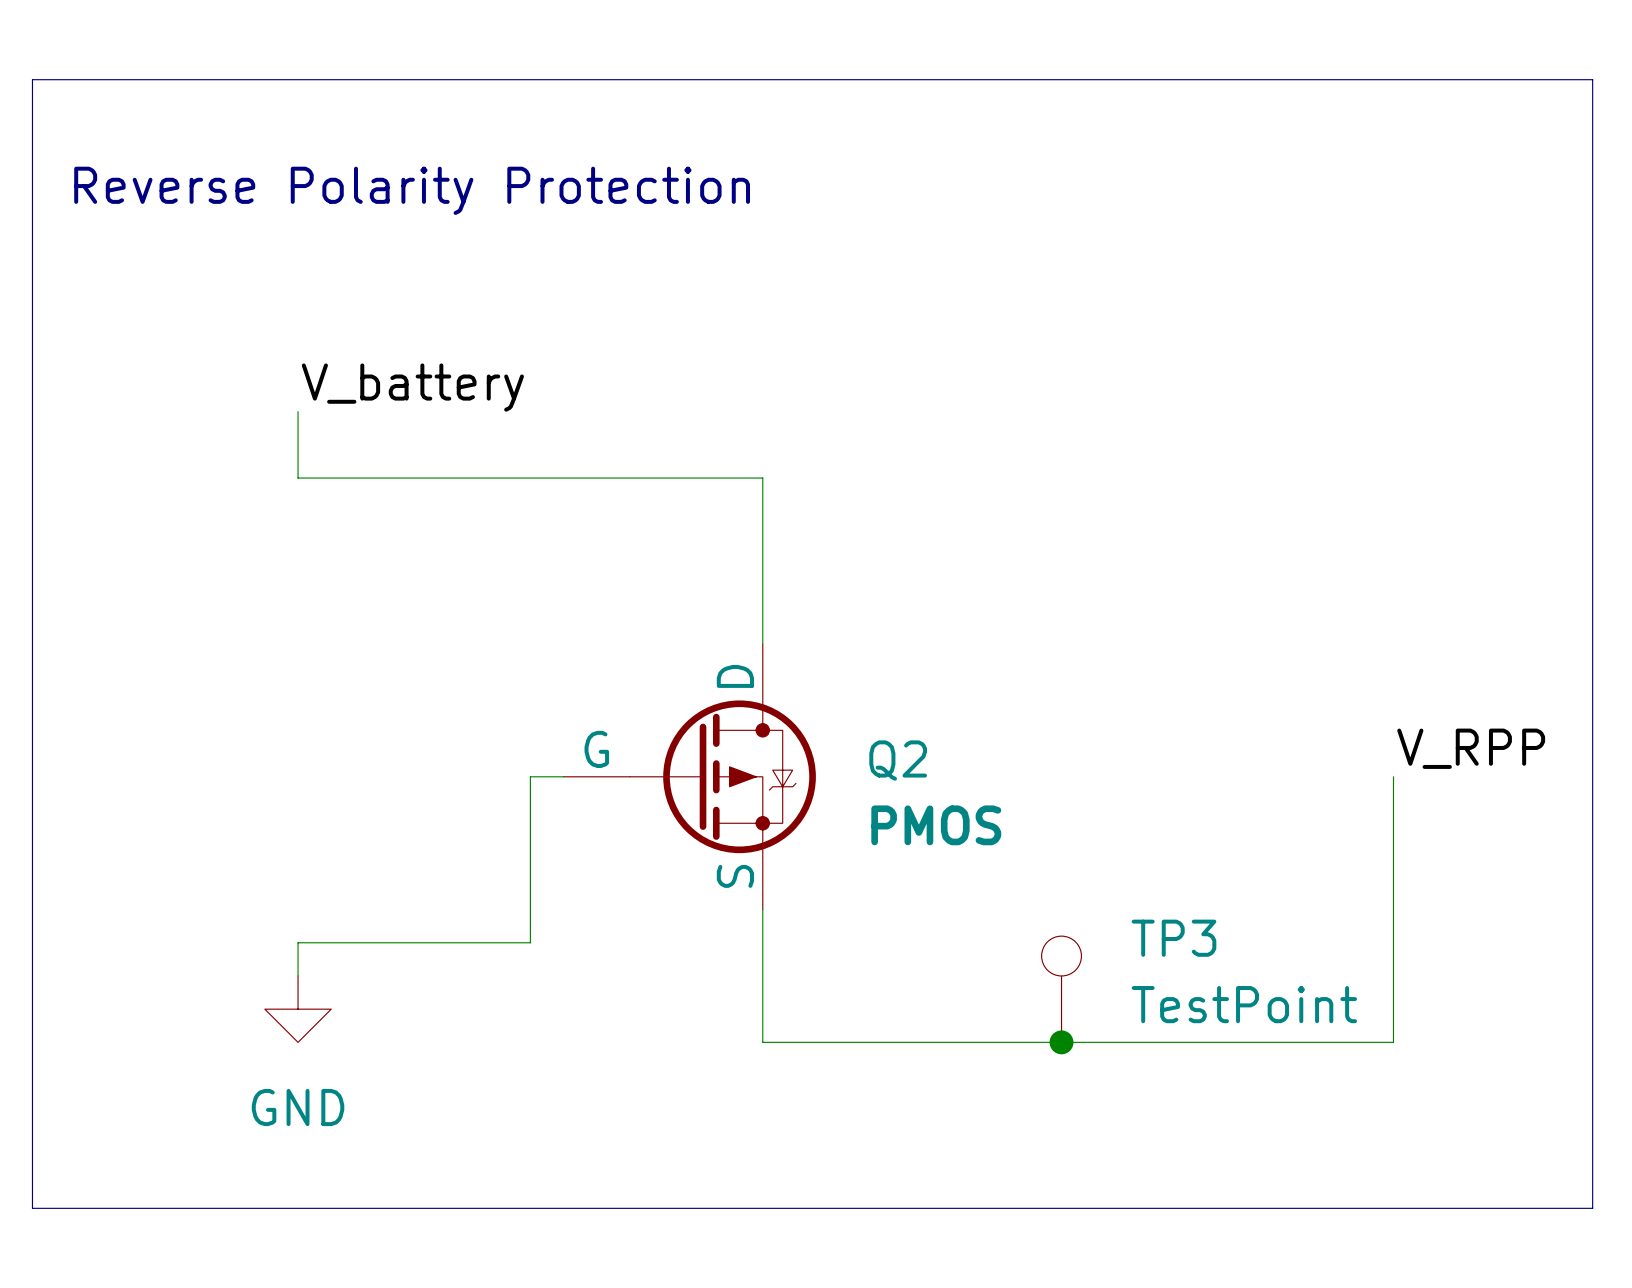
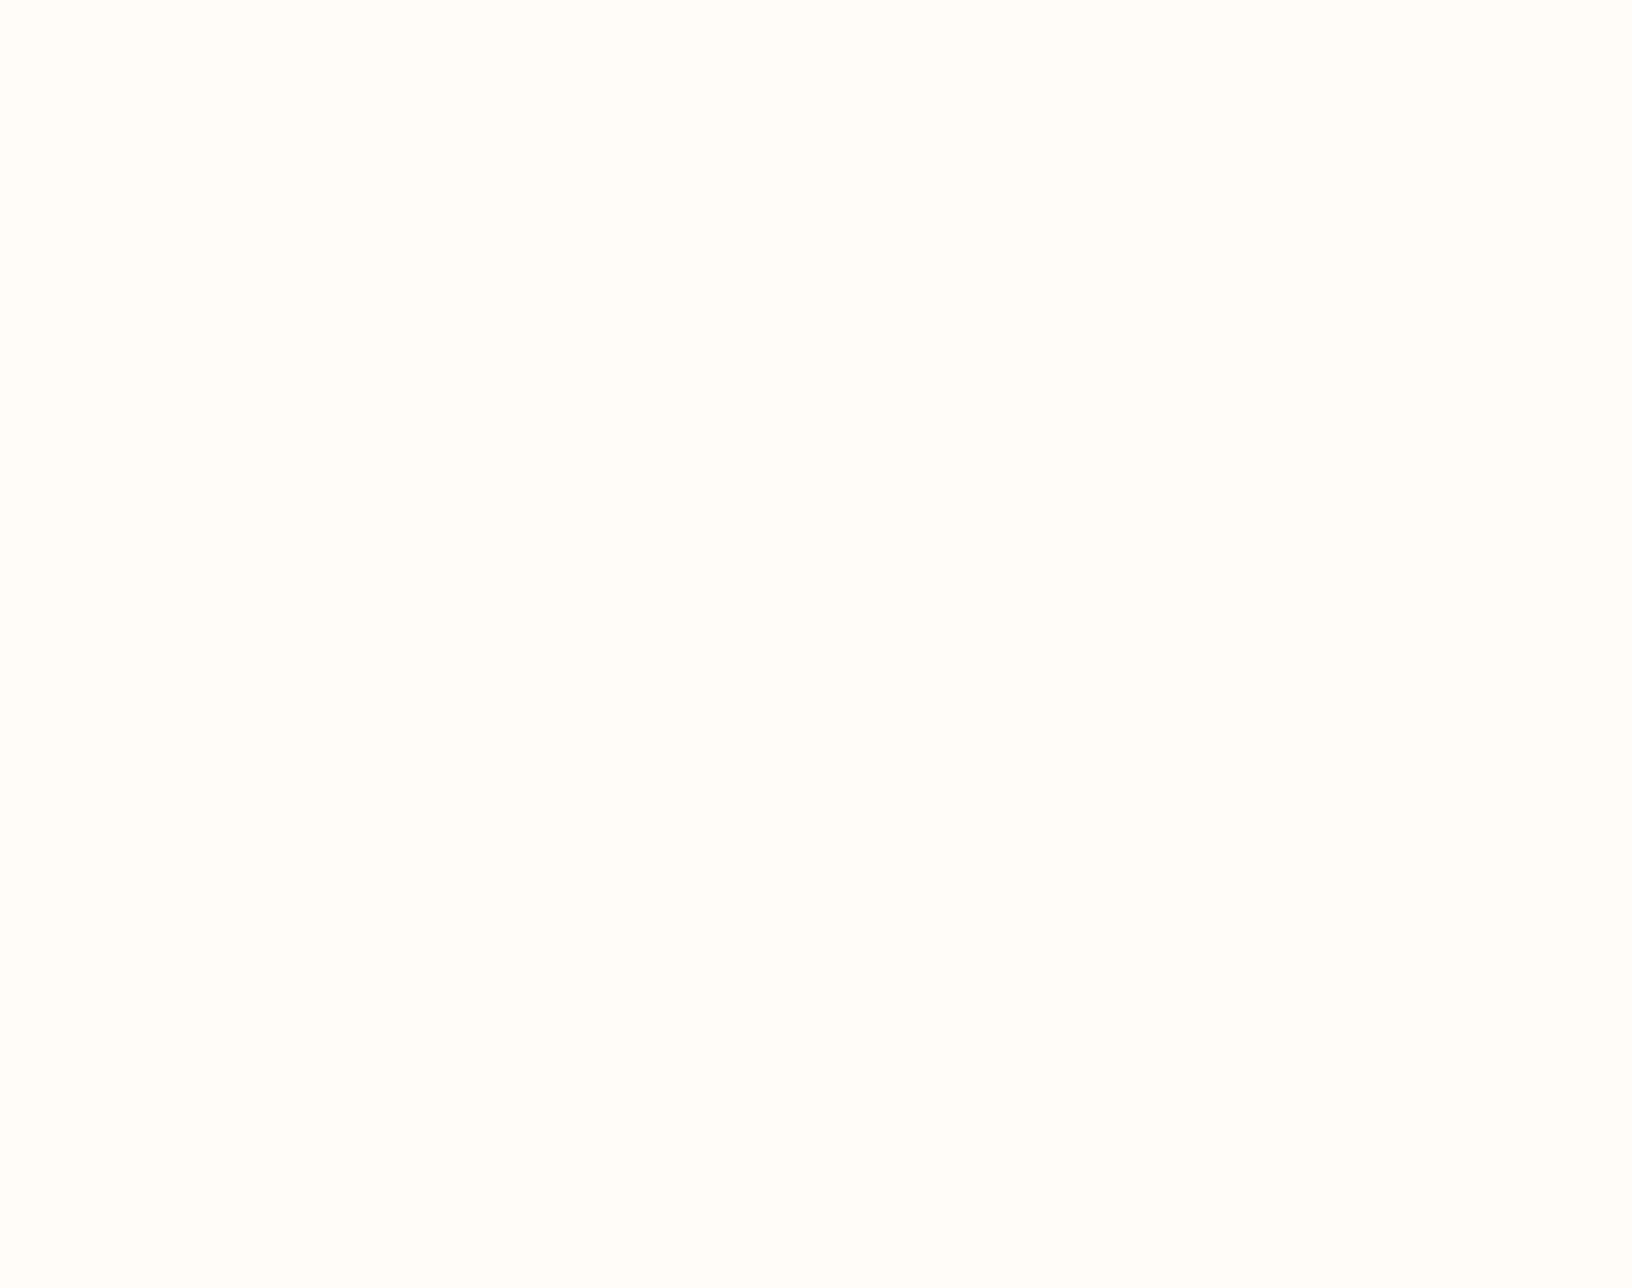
line: (32, 79) (1592, 79) (1592, 1208) (32, 1208) (32, 79) -> none
text: Reverse Polarity Protection (412, 190) -> none
label: V_battery (412, 387) -> none
wire: (298, 411) (298, 478) (762, 478) (762, 644) -> none
label: V_RPP (1471, 748) -> none
wire: (563, 776) (530, 776) (530, 942) (298, 942) (298, 975) -> none
Q2: PMOS (689, 776) -> none
wire: (1393, 776) (1393, 1042) (762, 1042) (762, 909) -> none
TP3: TestPoint (1061, 989) -> none
power symbol: GND (298, 1009) -> none
junction: (1061, 1042) -> none

